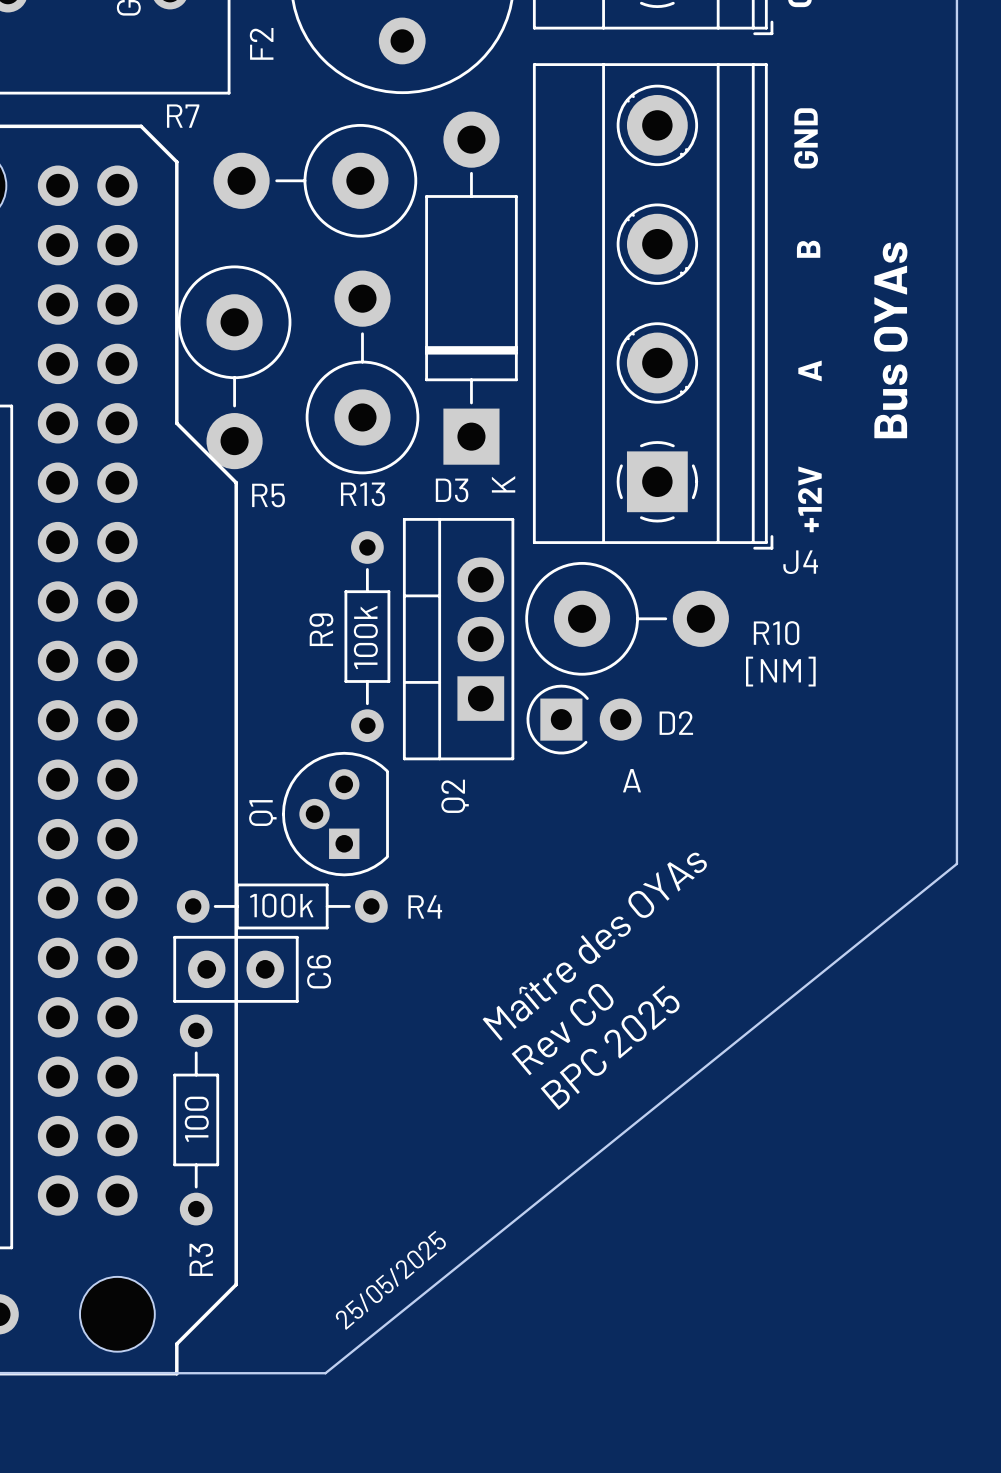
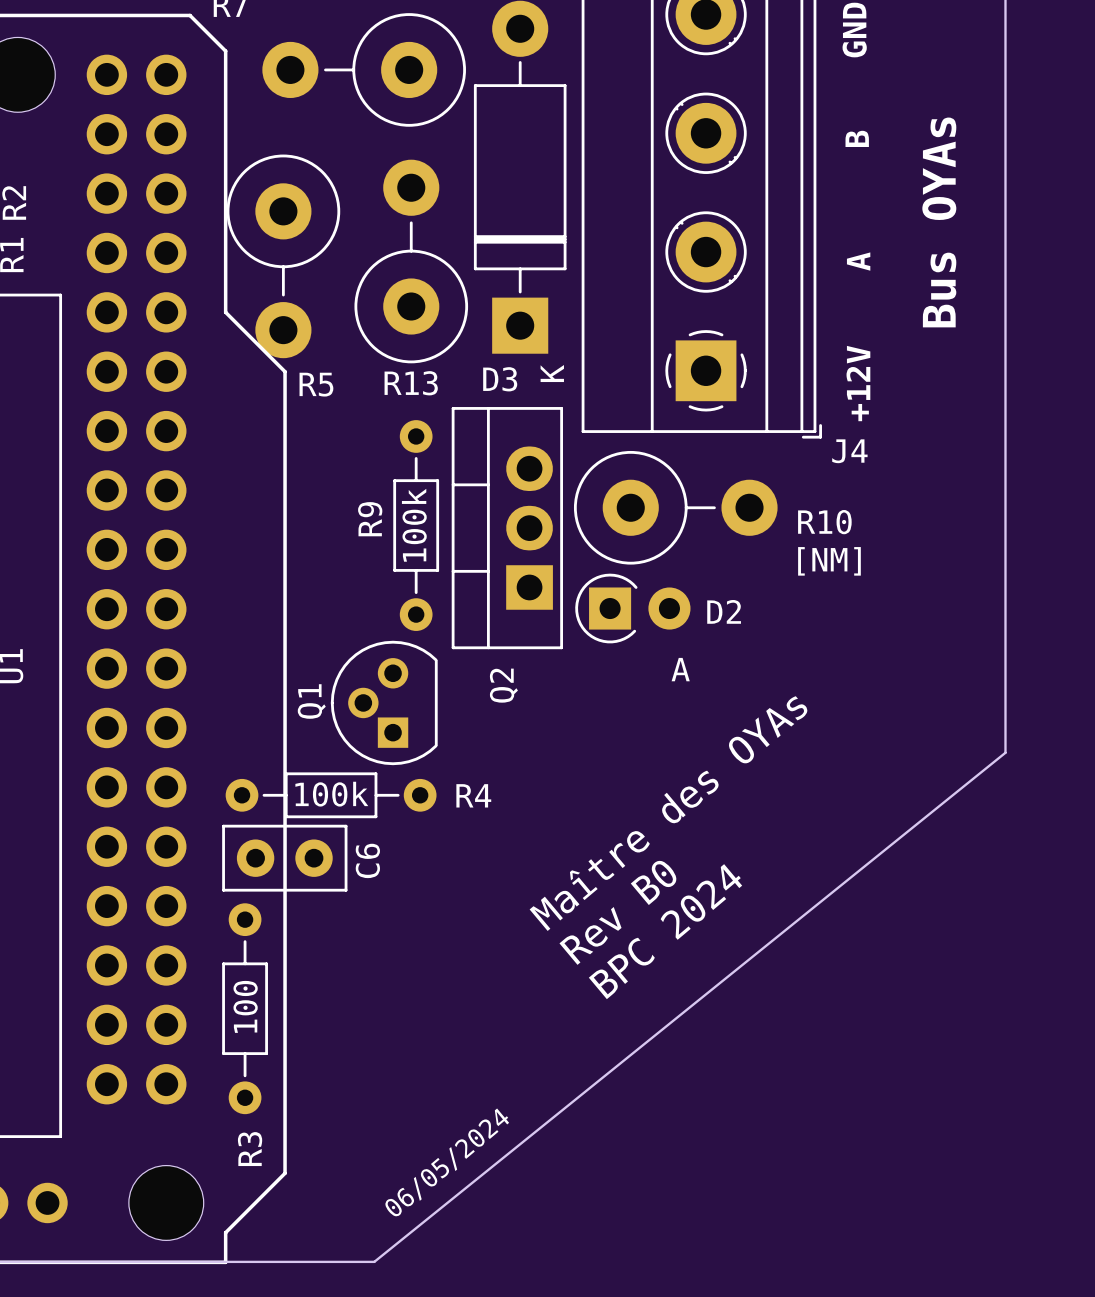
text: Rev C0 (562, 1029) -> Rev B0 (618, 912)
text: BPC 2025 (610, 1047) -> BPC 2024 (665, 931)
text: 25/05/2025 (390, 1280) -> 06/05/2024 (447, 1162)

